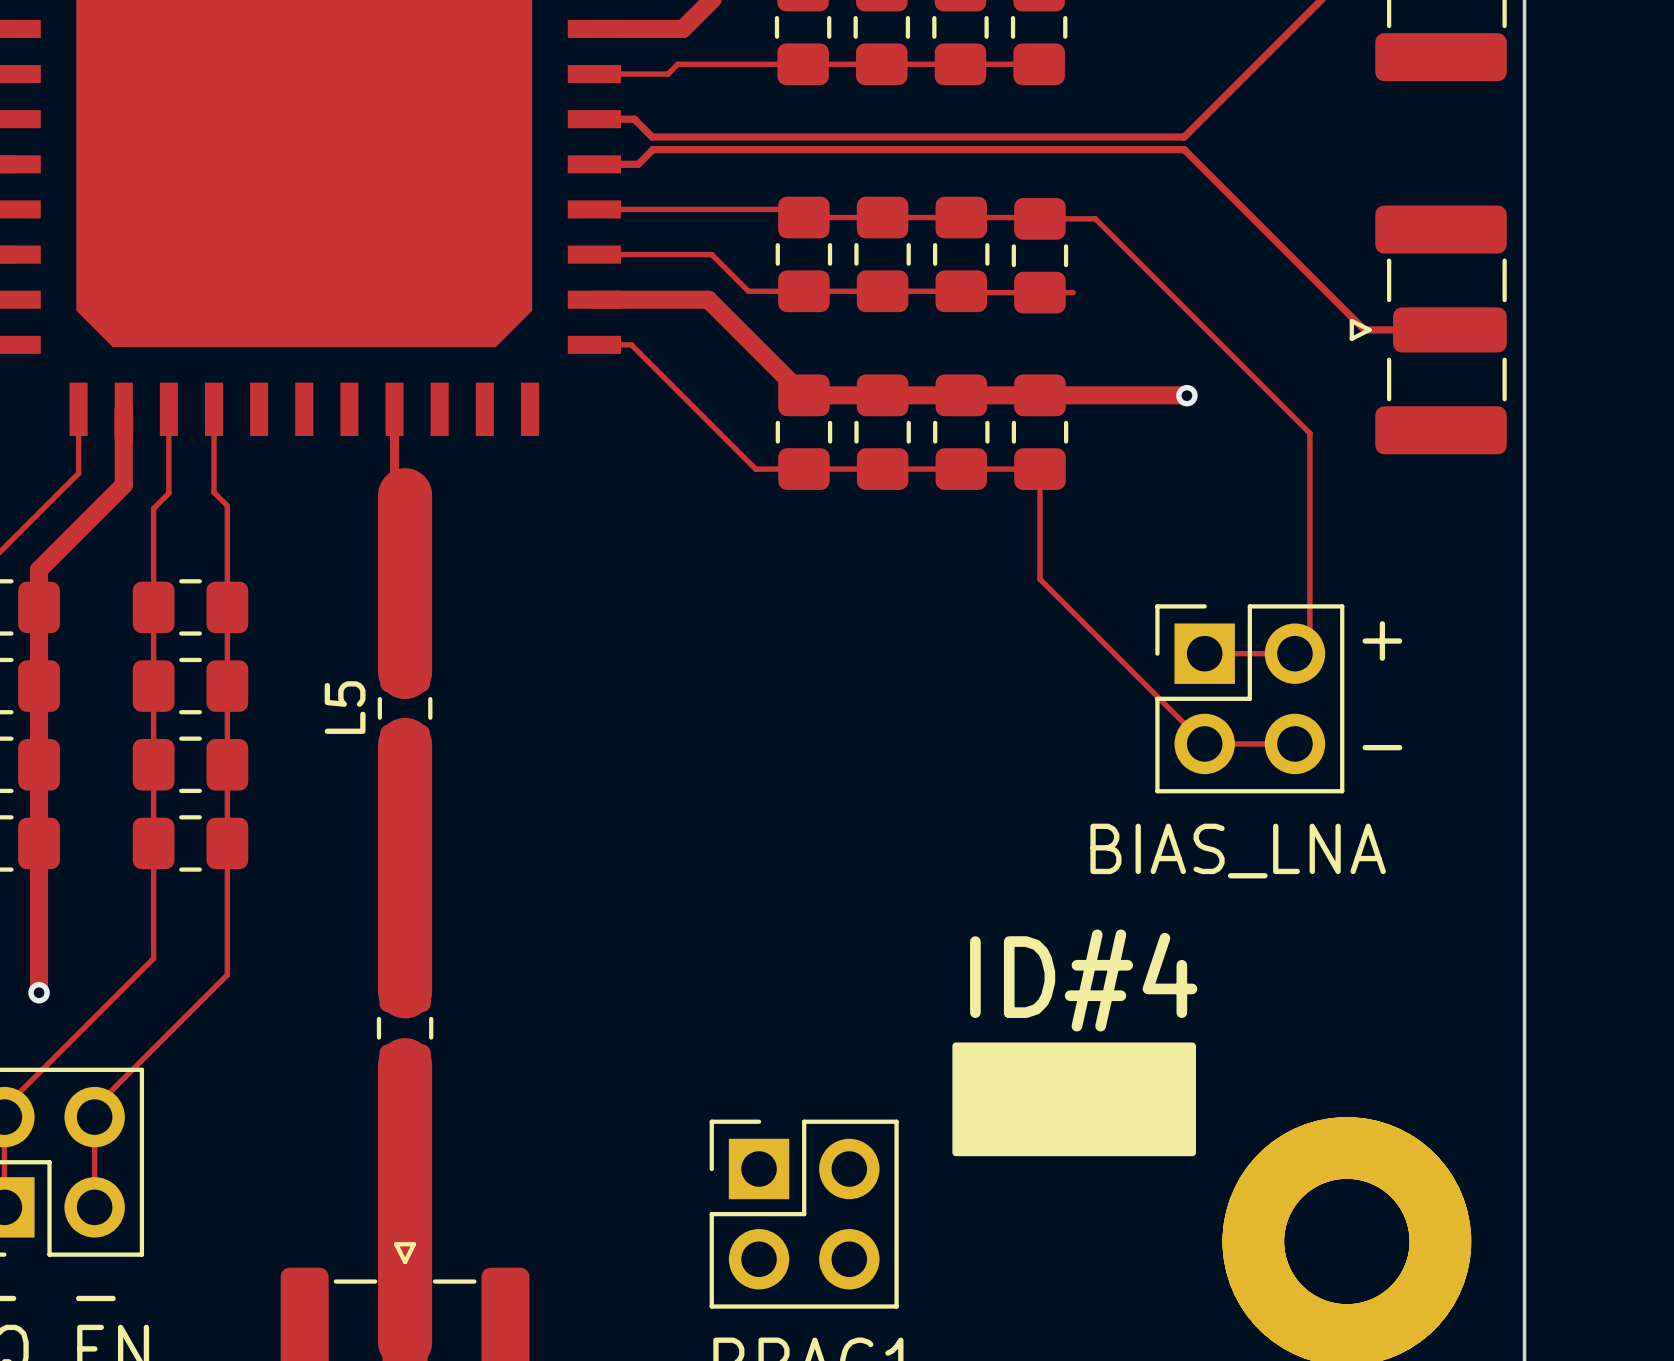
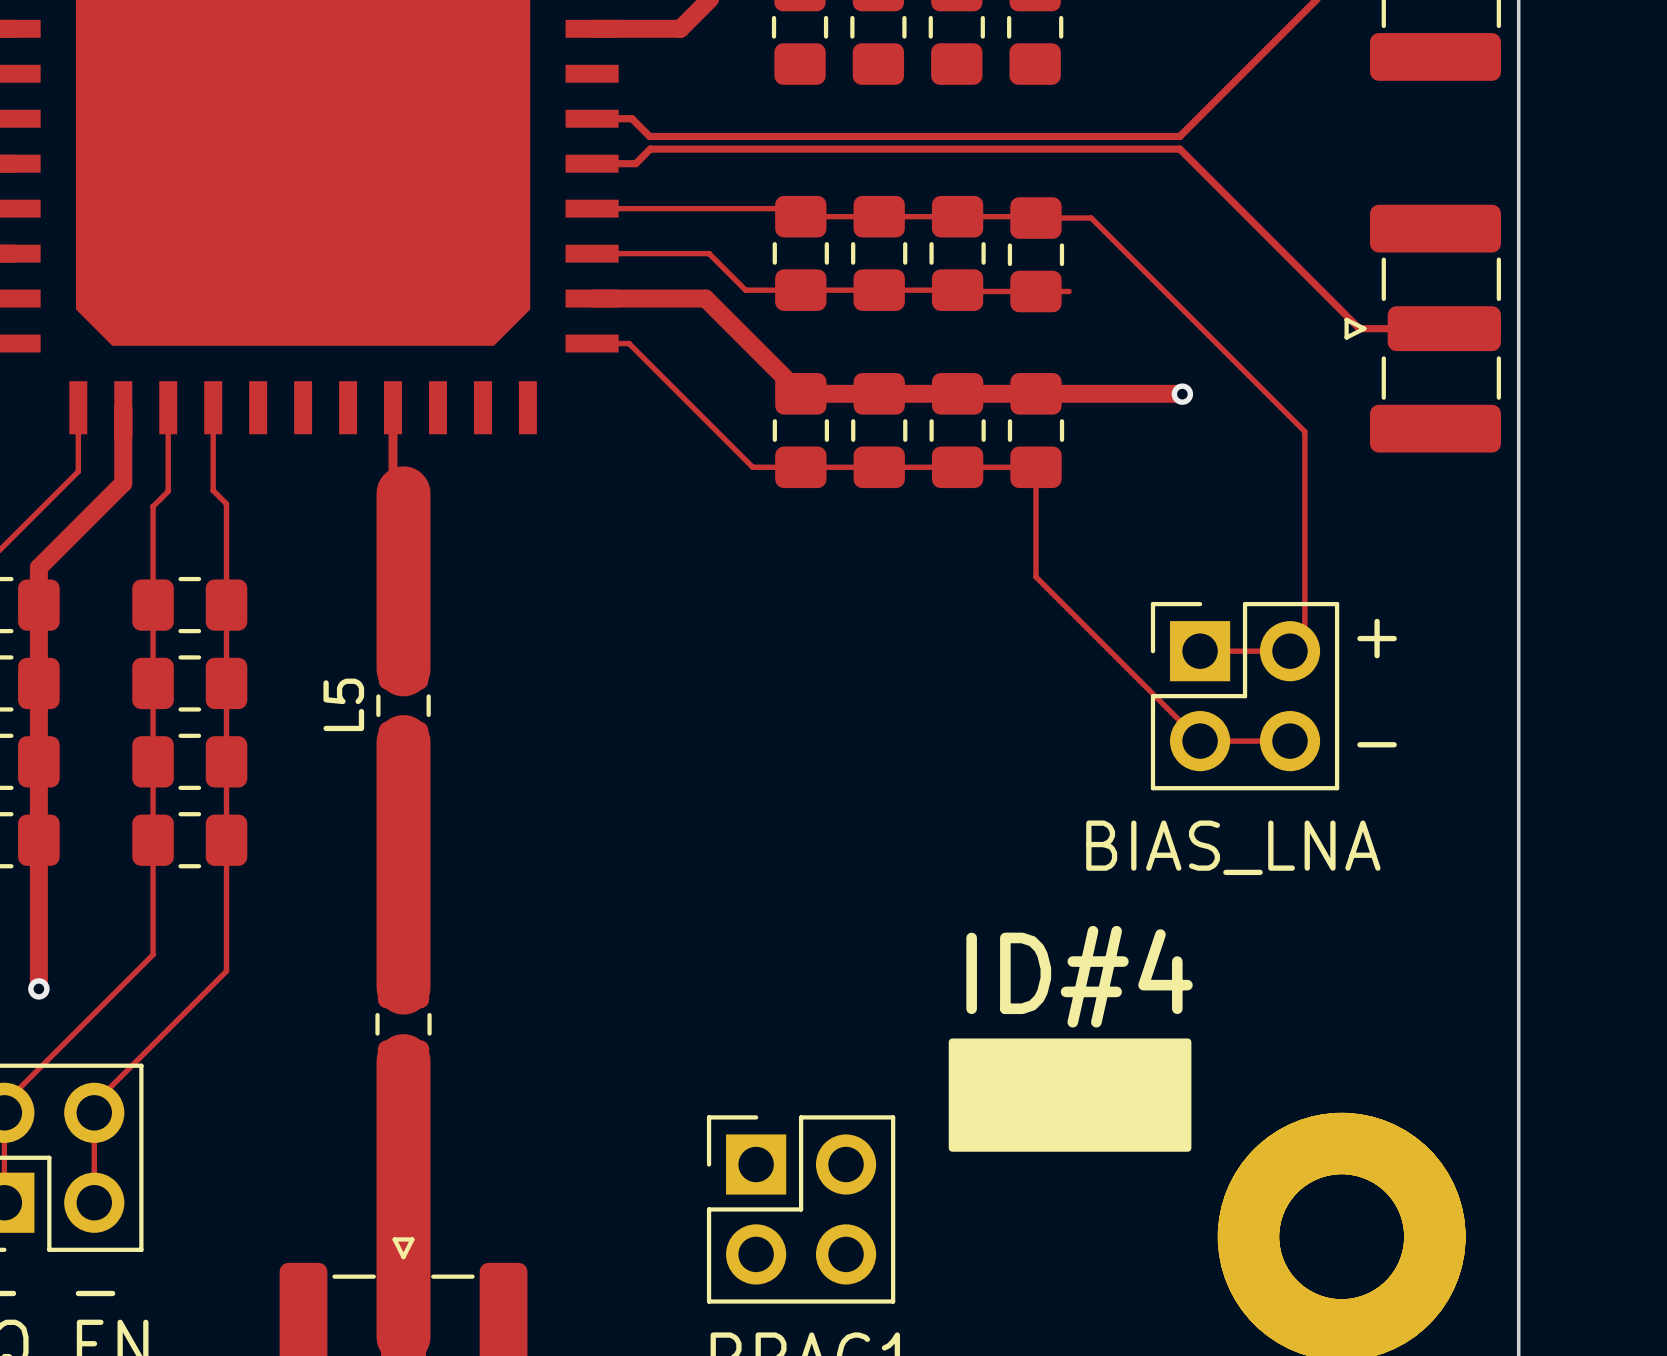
track: (1039, 64) (677, 64) (668, 74) (594, 74) -> none

